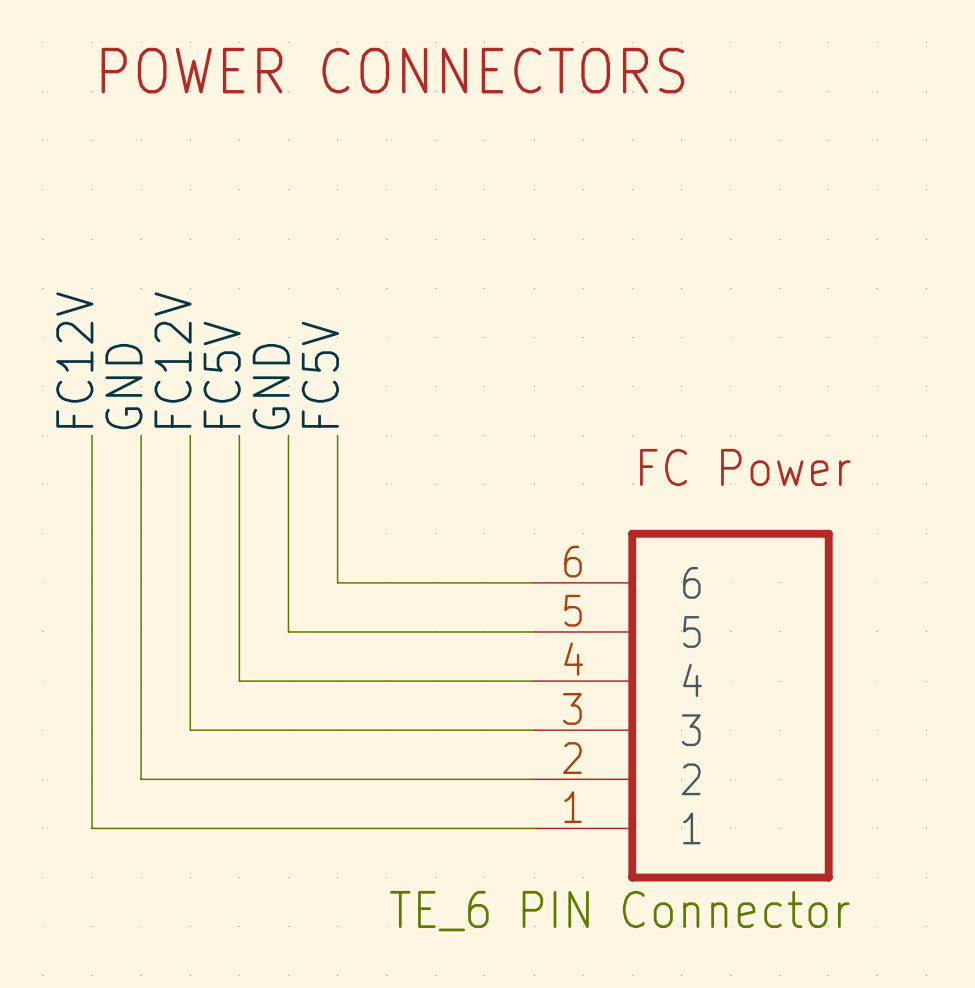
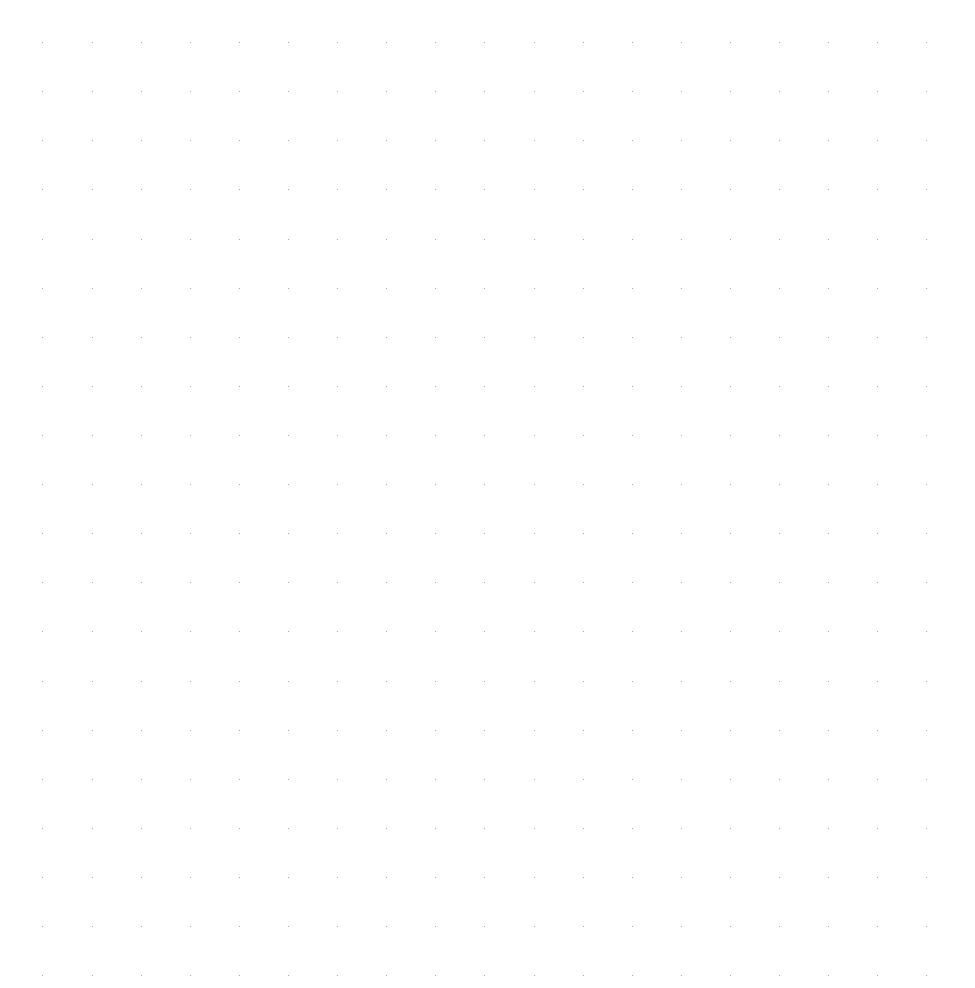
text: POWER CONNECTORS (392, 70) -> none
label: FC12V (74, 360) -> none
label: FC12V (173, 360) -> none
label: FC5V (222, 374) -> none
label: FC5V (320, 374) -> none
label: GND (123, 386) -> none
label: GND (271, 386) -> none
wire: (92, 435) (92, 828) (534, 828) -> none
wire: (141, 435) (141, 779) (534, 779) -> none
wire: (190, 435) (190, 730) (534, 730) -> none
wire: (239, 435) (239, 681) (534, 681) -> none
wire: (288, 435) (288, 631) (534, 631) -> none
wire: (337, 435) (337, 582) (534, 582) -> none
text: FC Power (745, 467) -> none
part: (683, 705) -> none
text: TE_6 PIN Connector (619, 911) -> none

